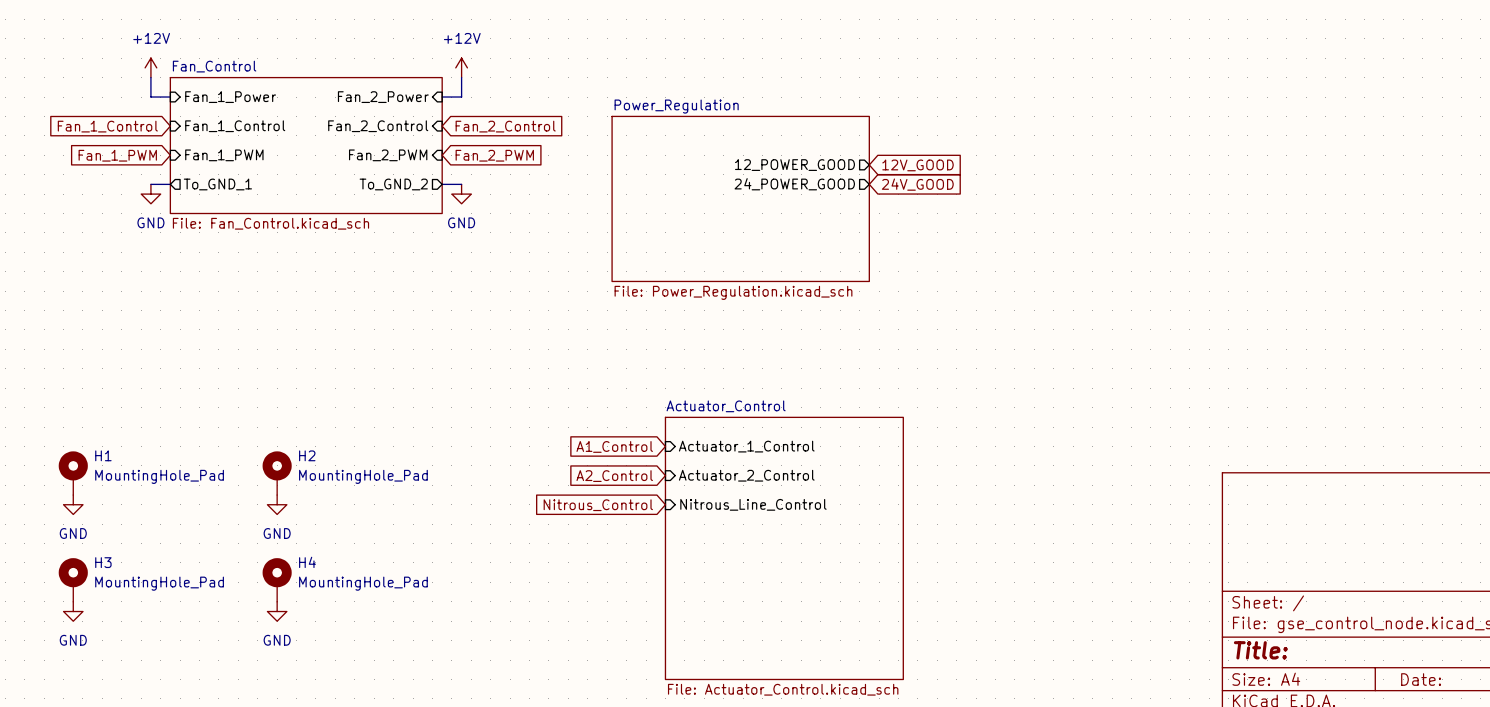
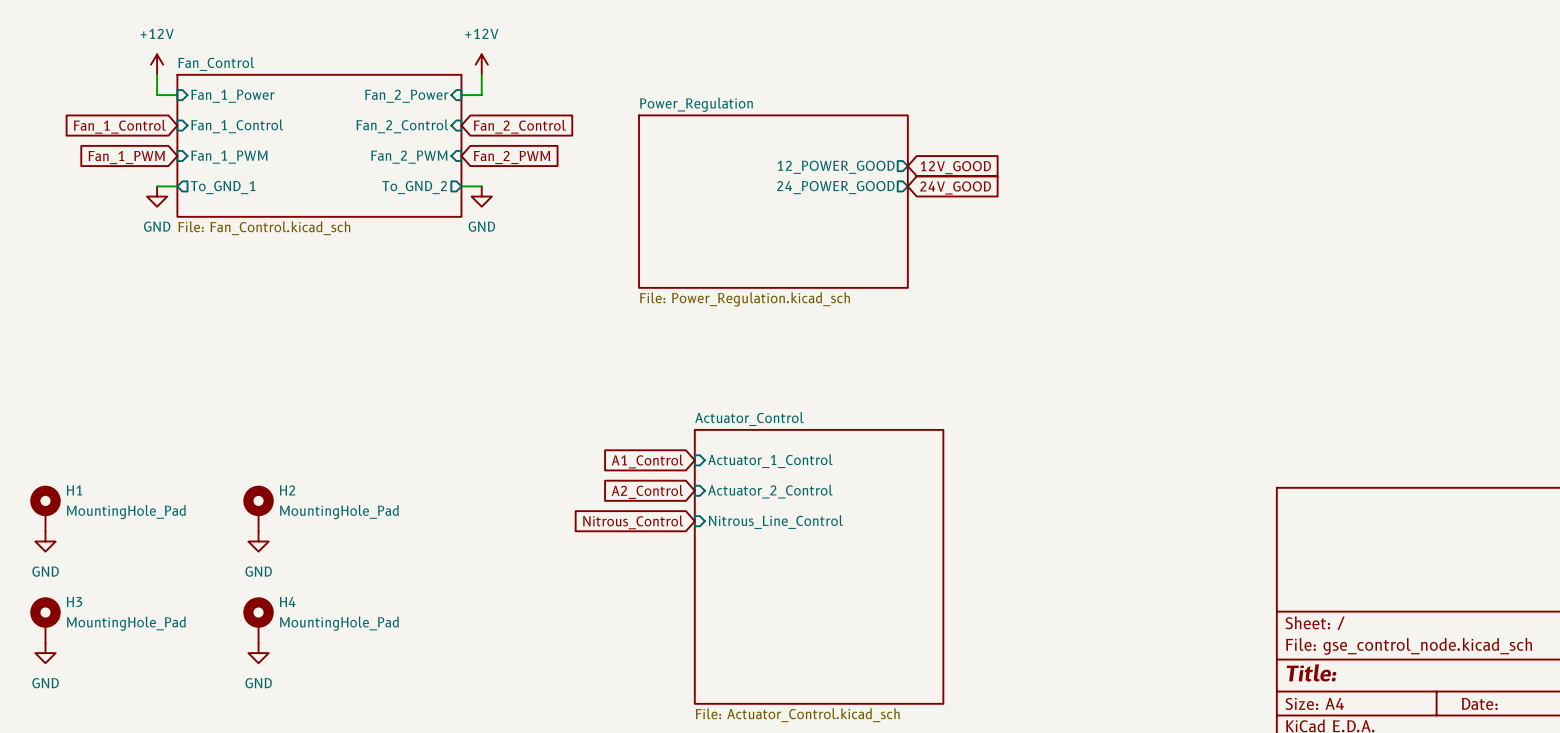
H1 position: (73, 473) -> (45, 508)
H2 position: (277, 473) -> (258, 508)
power symbol position: GND (73, 504) -> GND (45, 541)
power symbol position: GND (277, 504) -> GND (258, 541)
H3 position: (73, 579) -> (45, 620)
H4 position: (277, 579) -> (258, 620)
power symbol position: GND (73, 611) -> GND (45, 653)
power symbol position: GND (277, 611) -> GND (258, 653)

